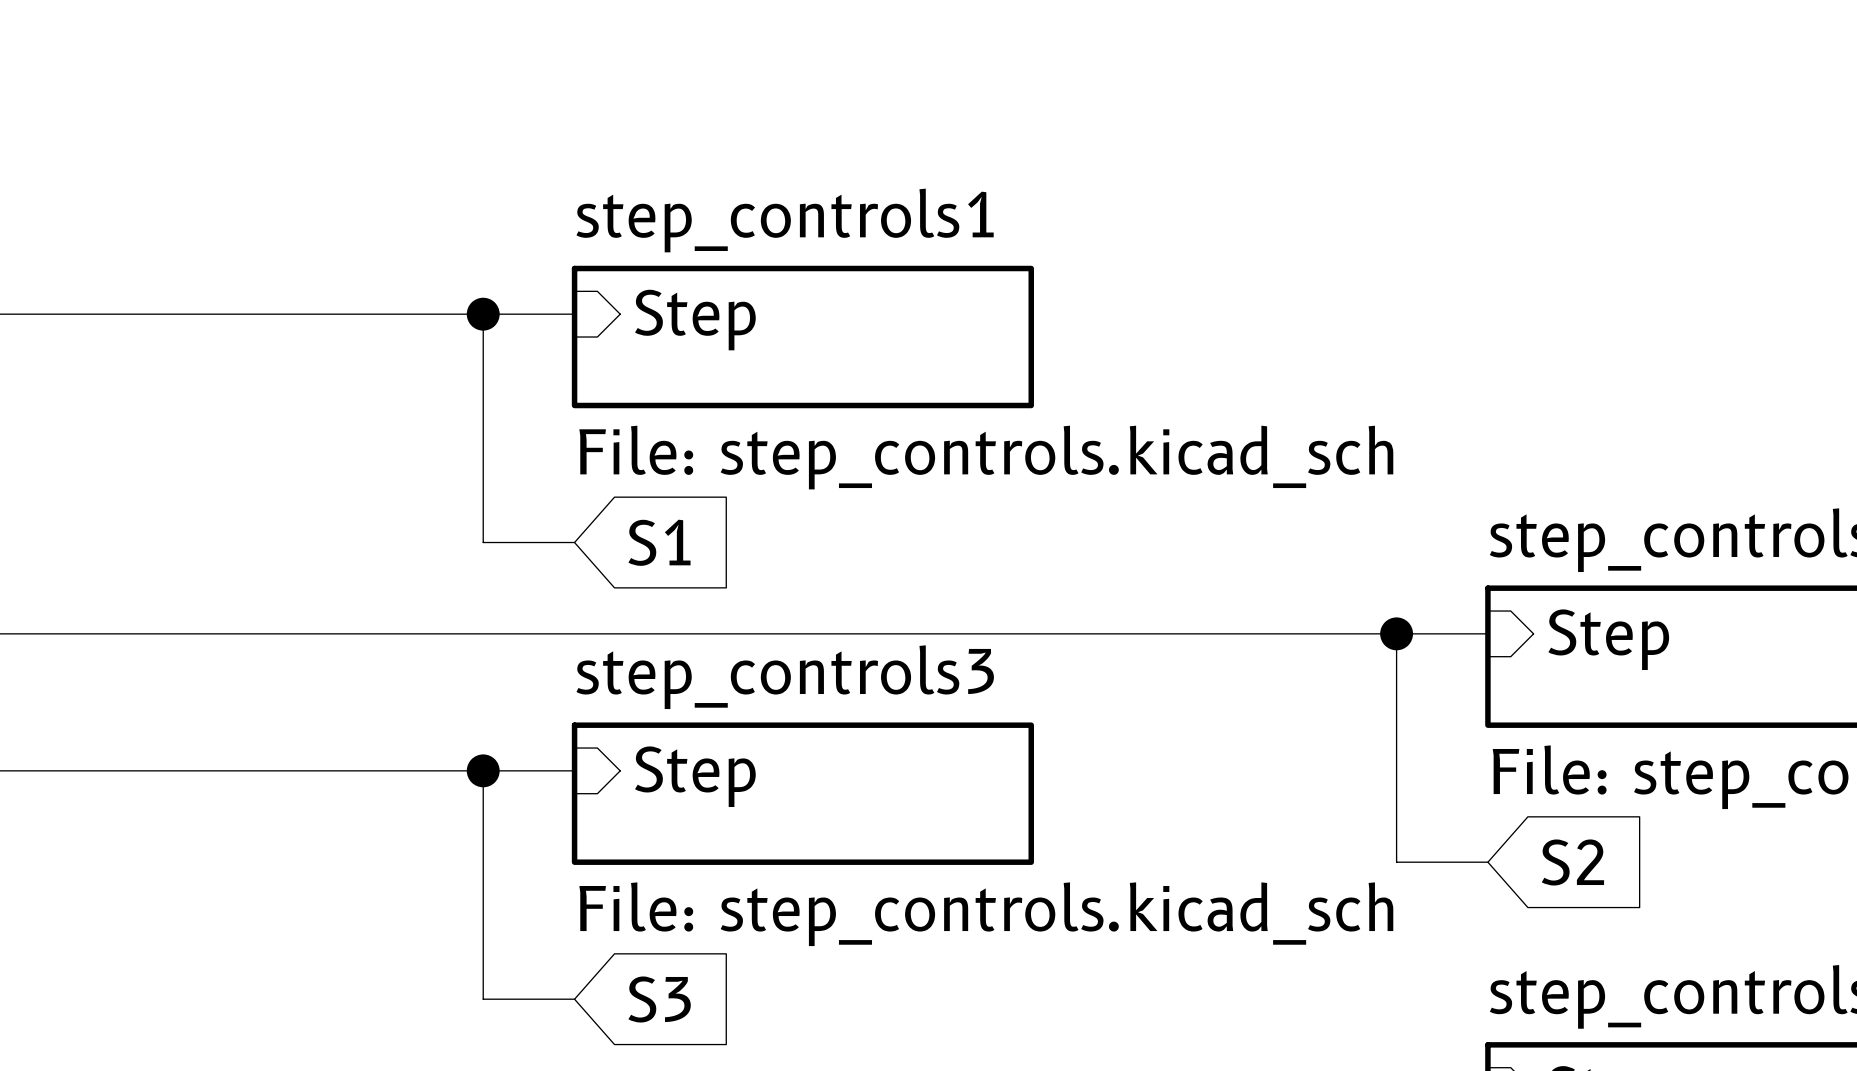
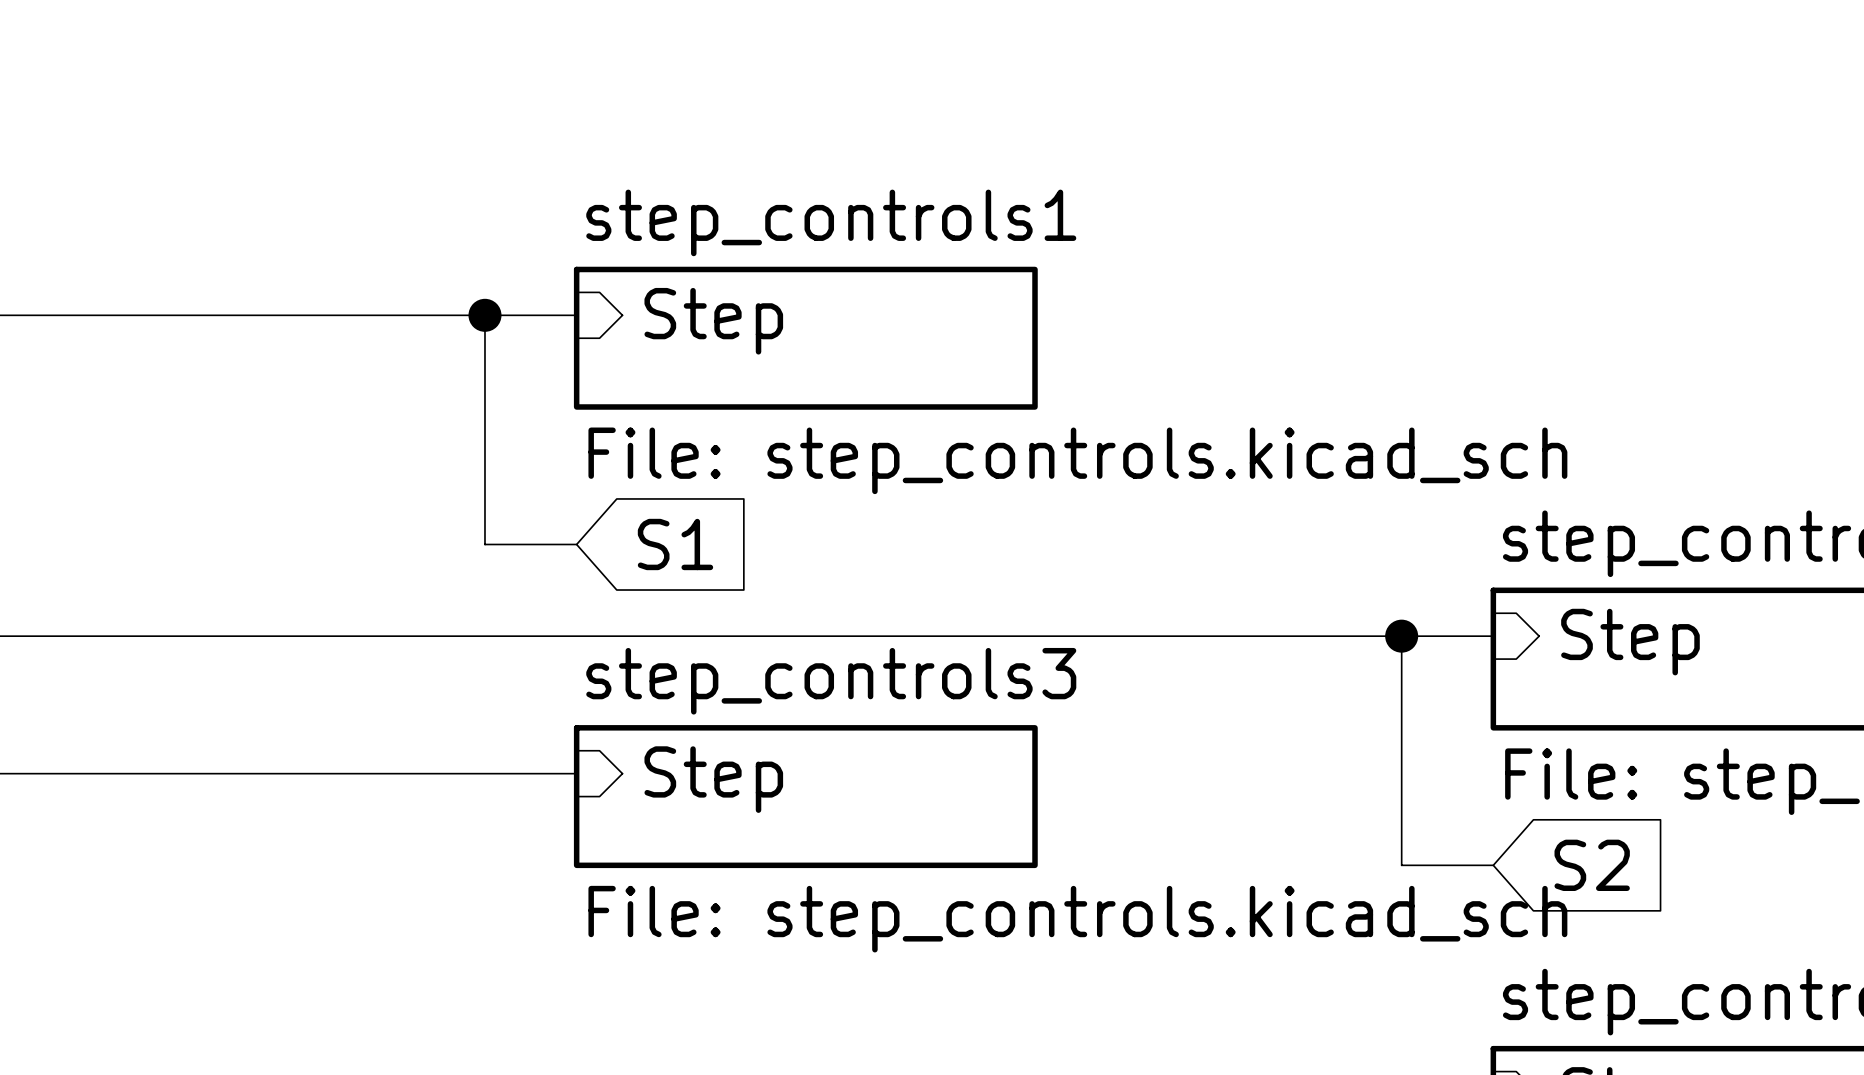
wire: (483, 770) (483, 999) (574, 999) -> none
junction: (483, 770) -> none
global label: S3 (659, 999) -> none

